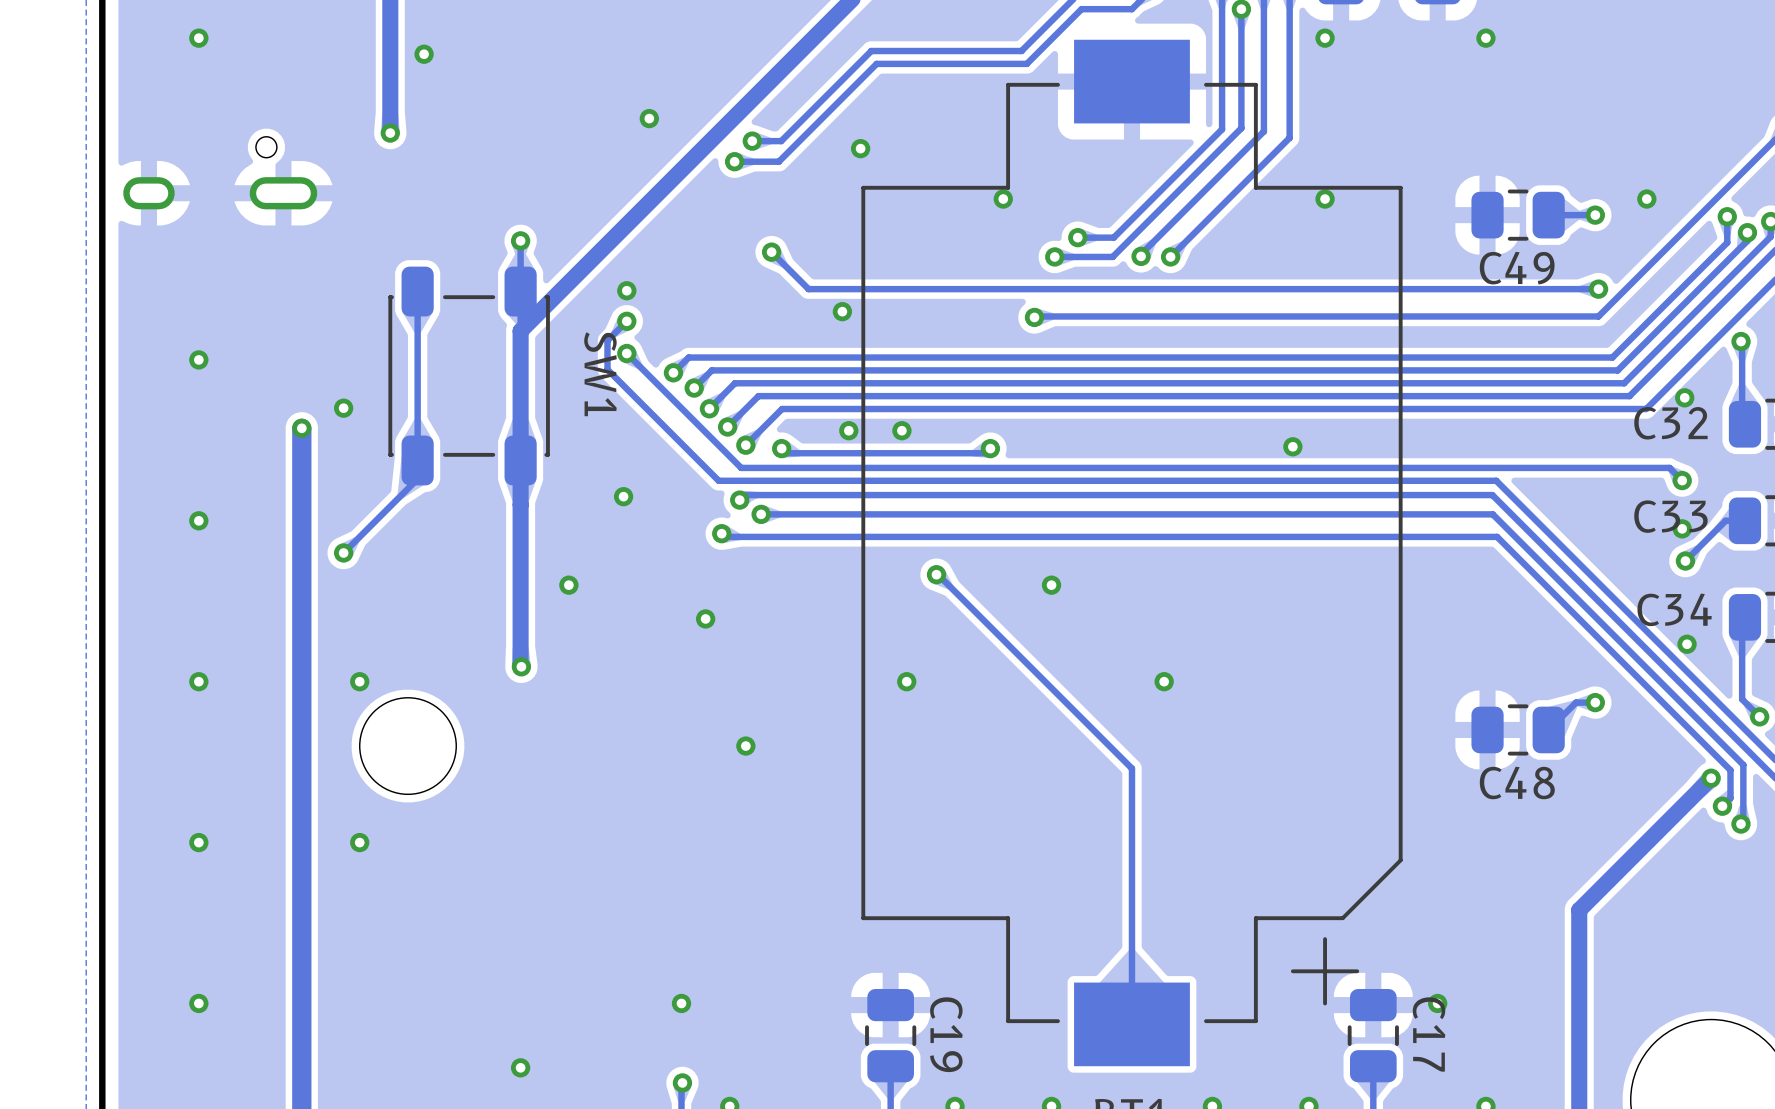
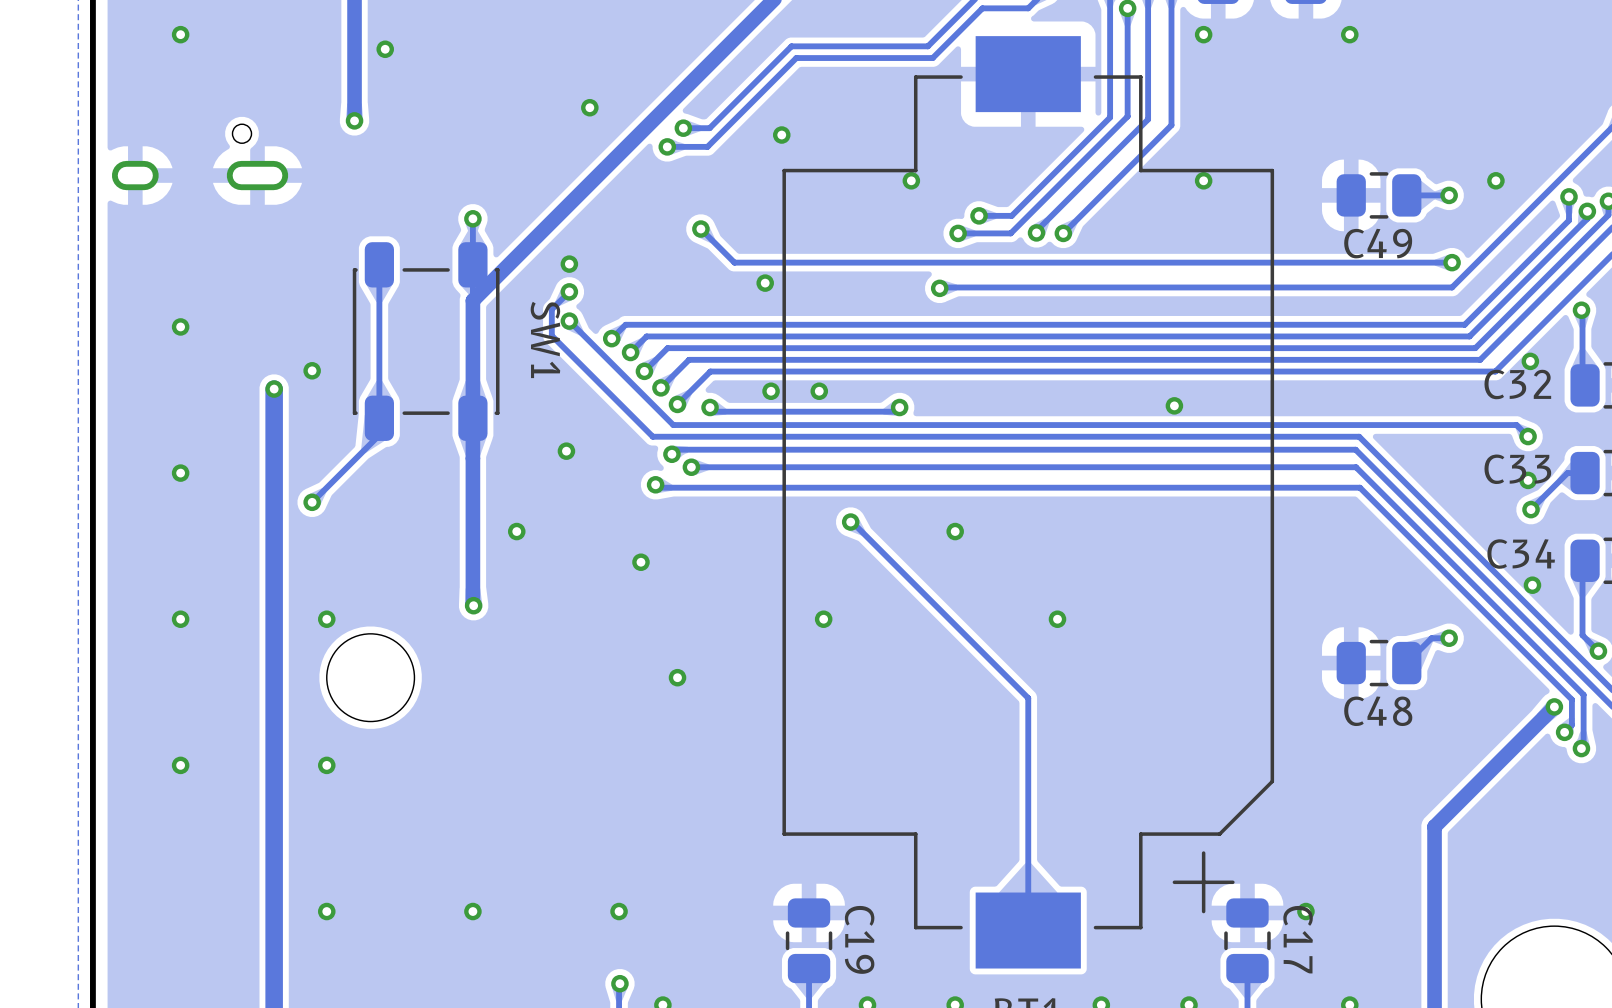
via: (198, 1003) -> none
via: none -> (326, 911)
via position: (520, 1067) -> (472, 911)

